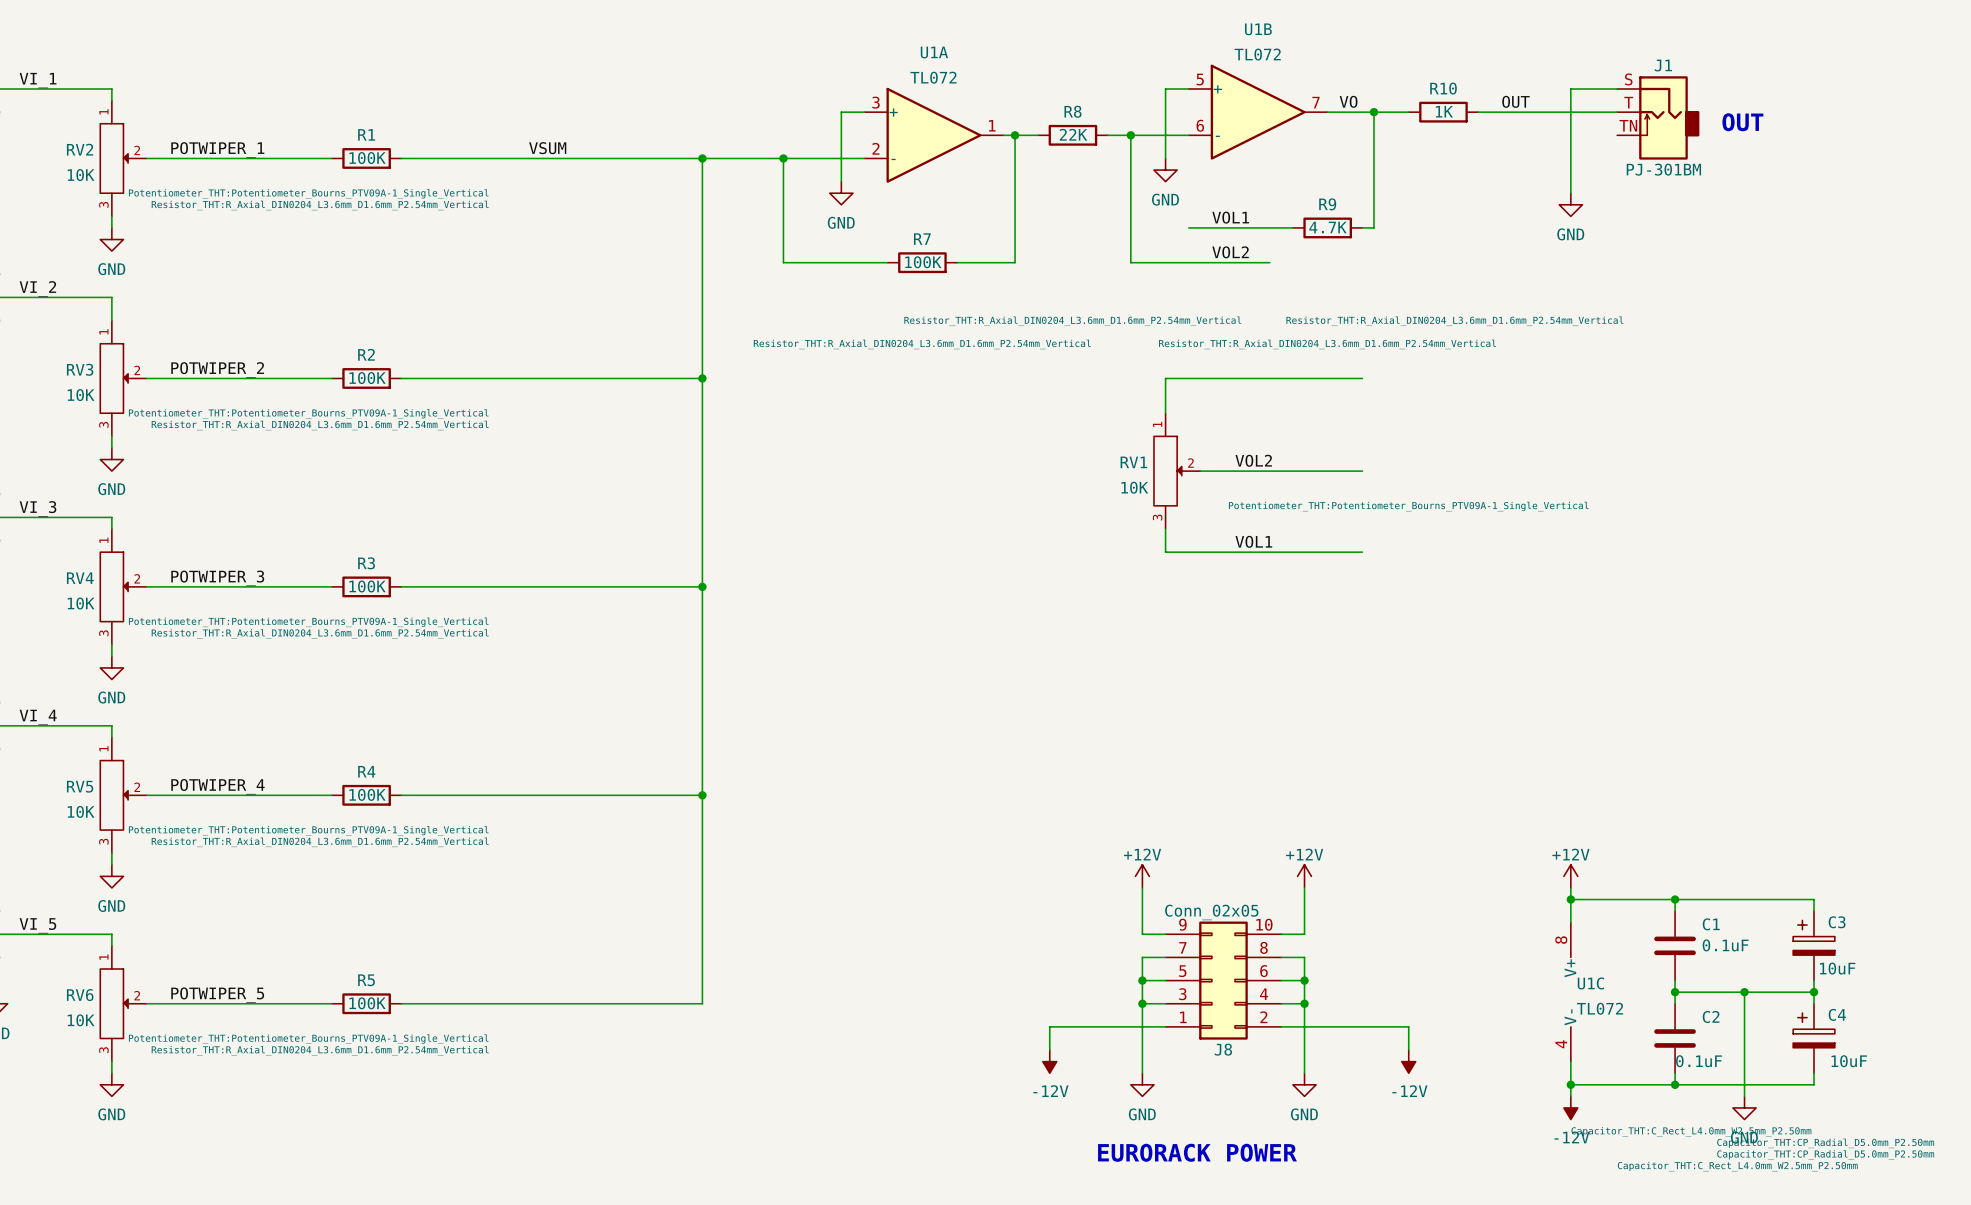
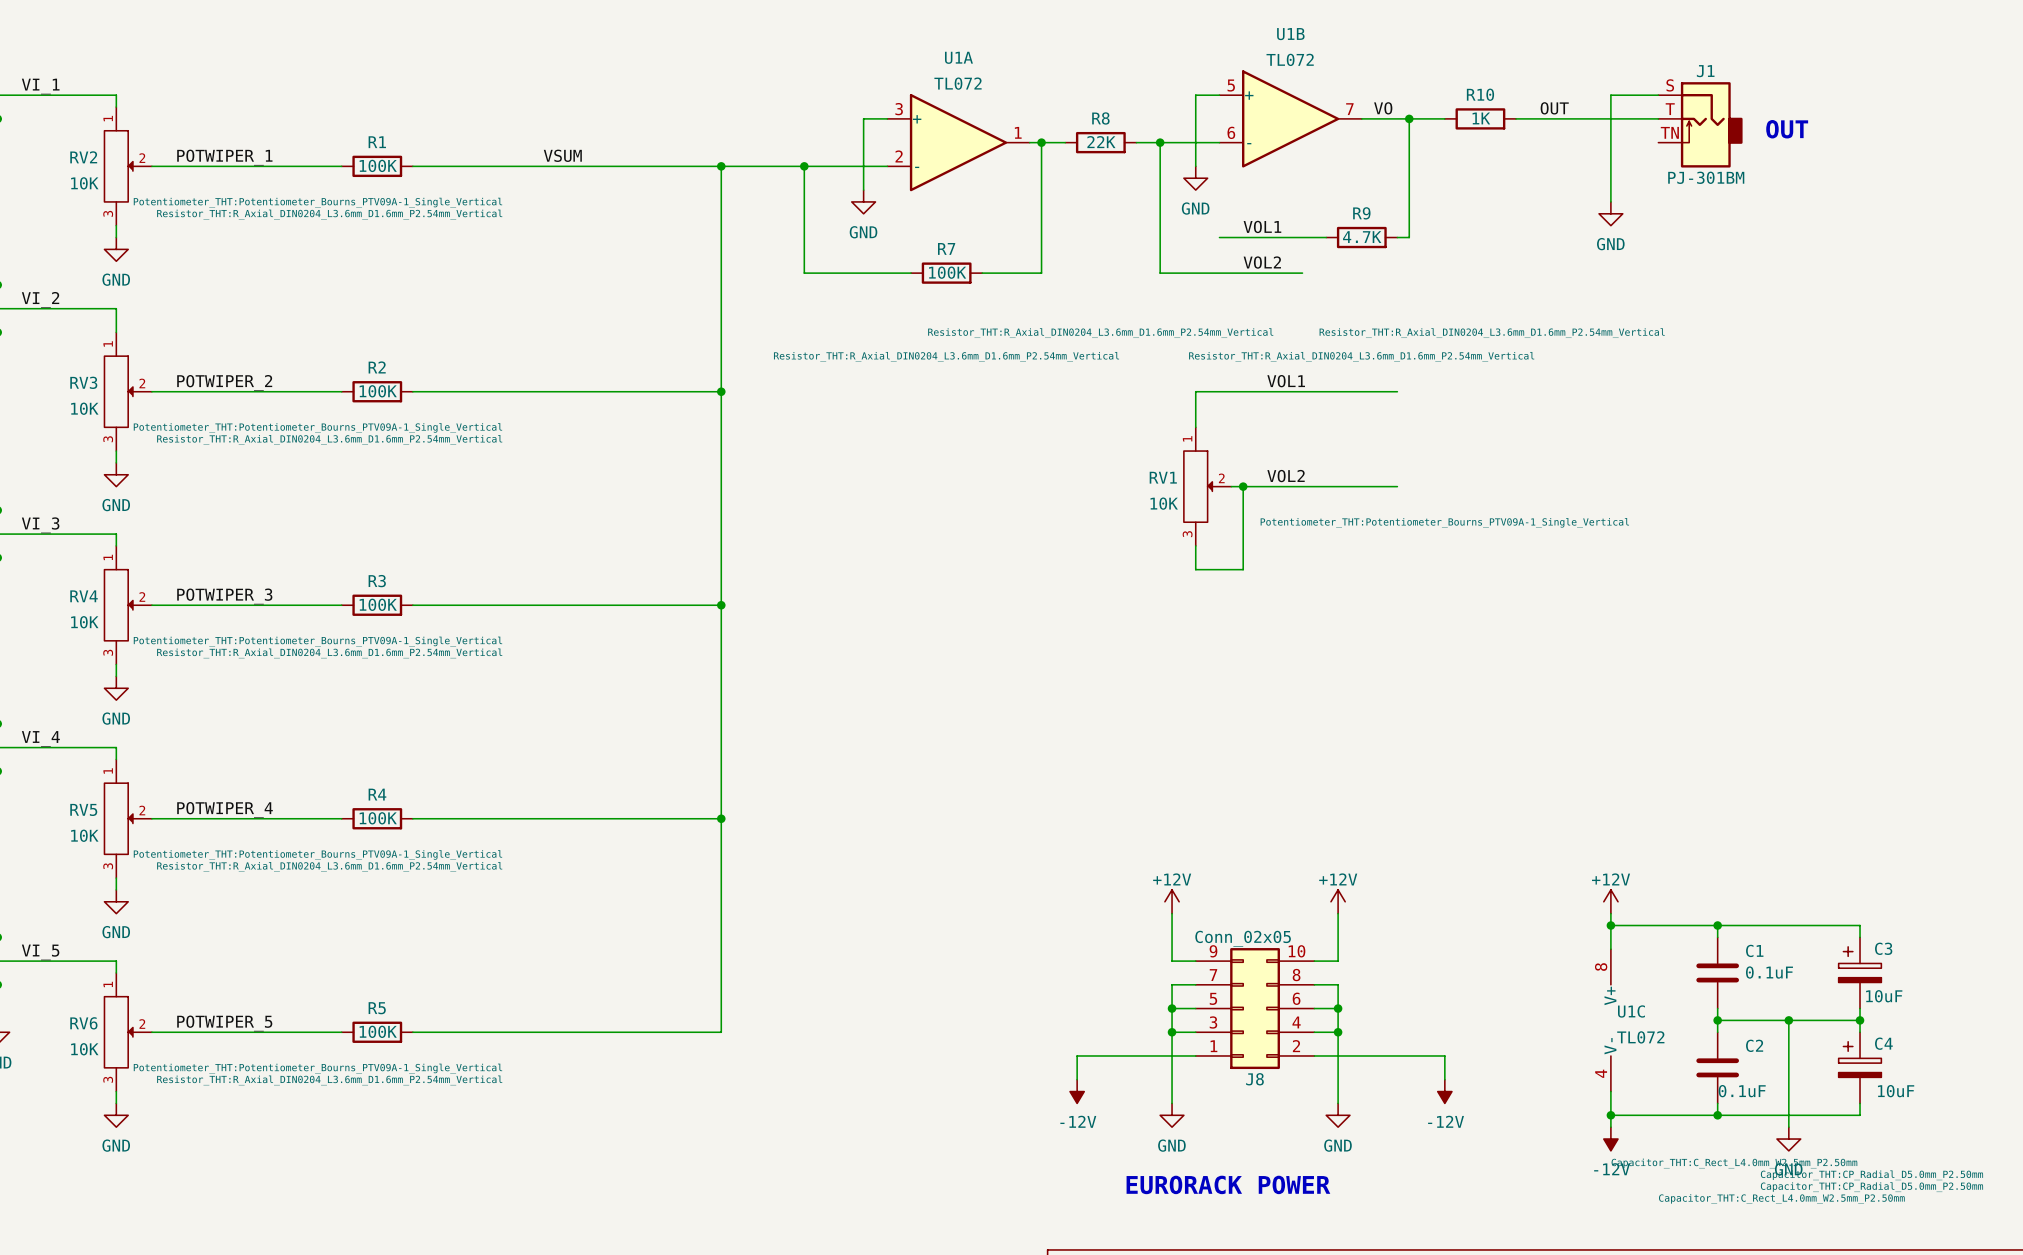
junction: none -> (1243, 486)
label position: VOL1 (1253, 541) -> VOL1 (1286, 381)
wire: (1211, 552) (1362, 552) -> (1243, 569) (1243, 486)

